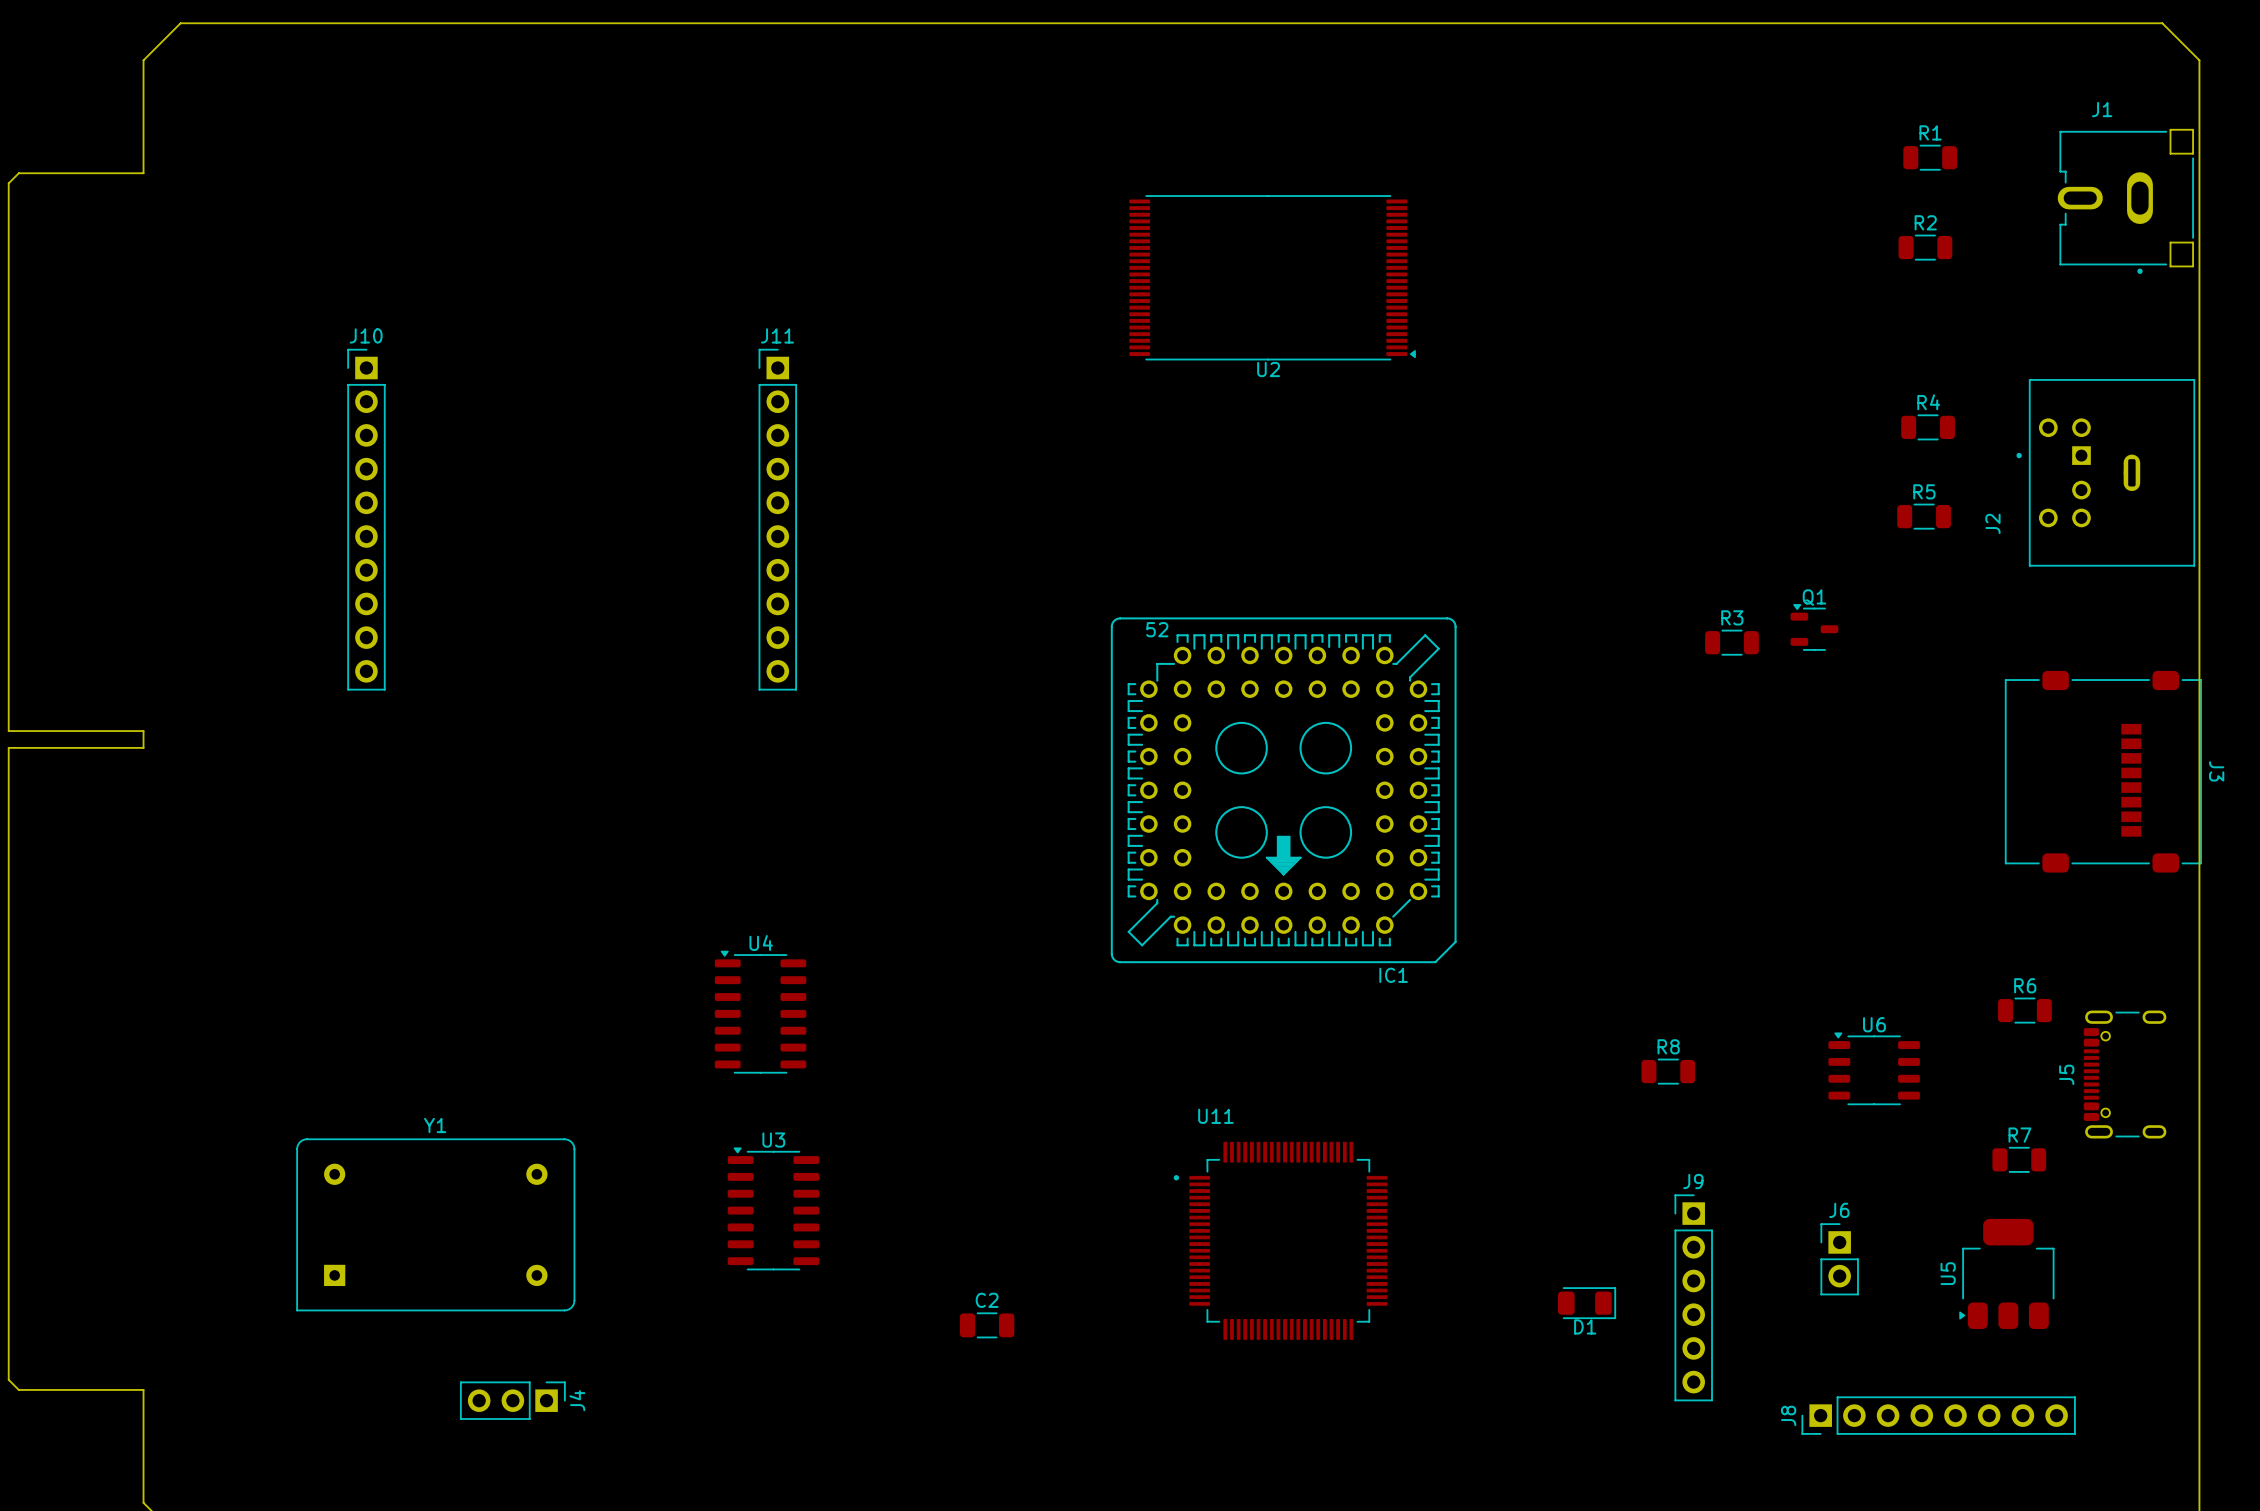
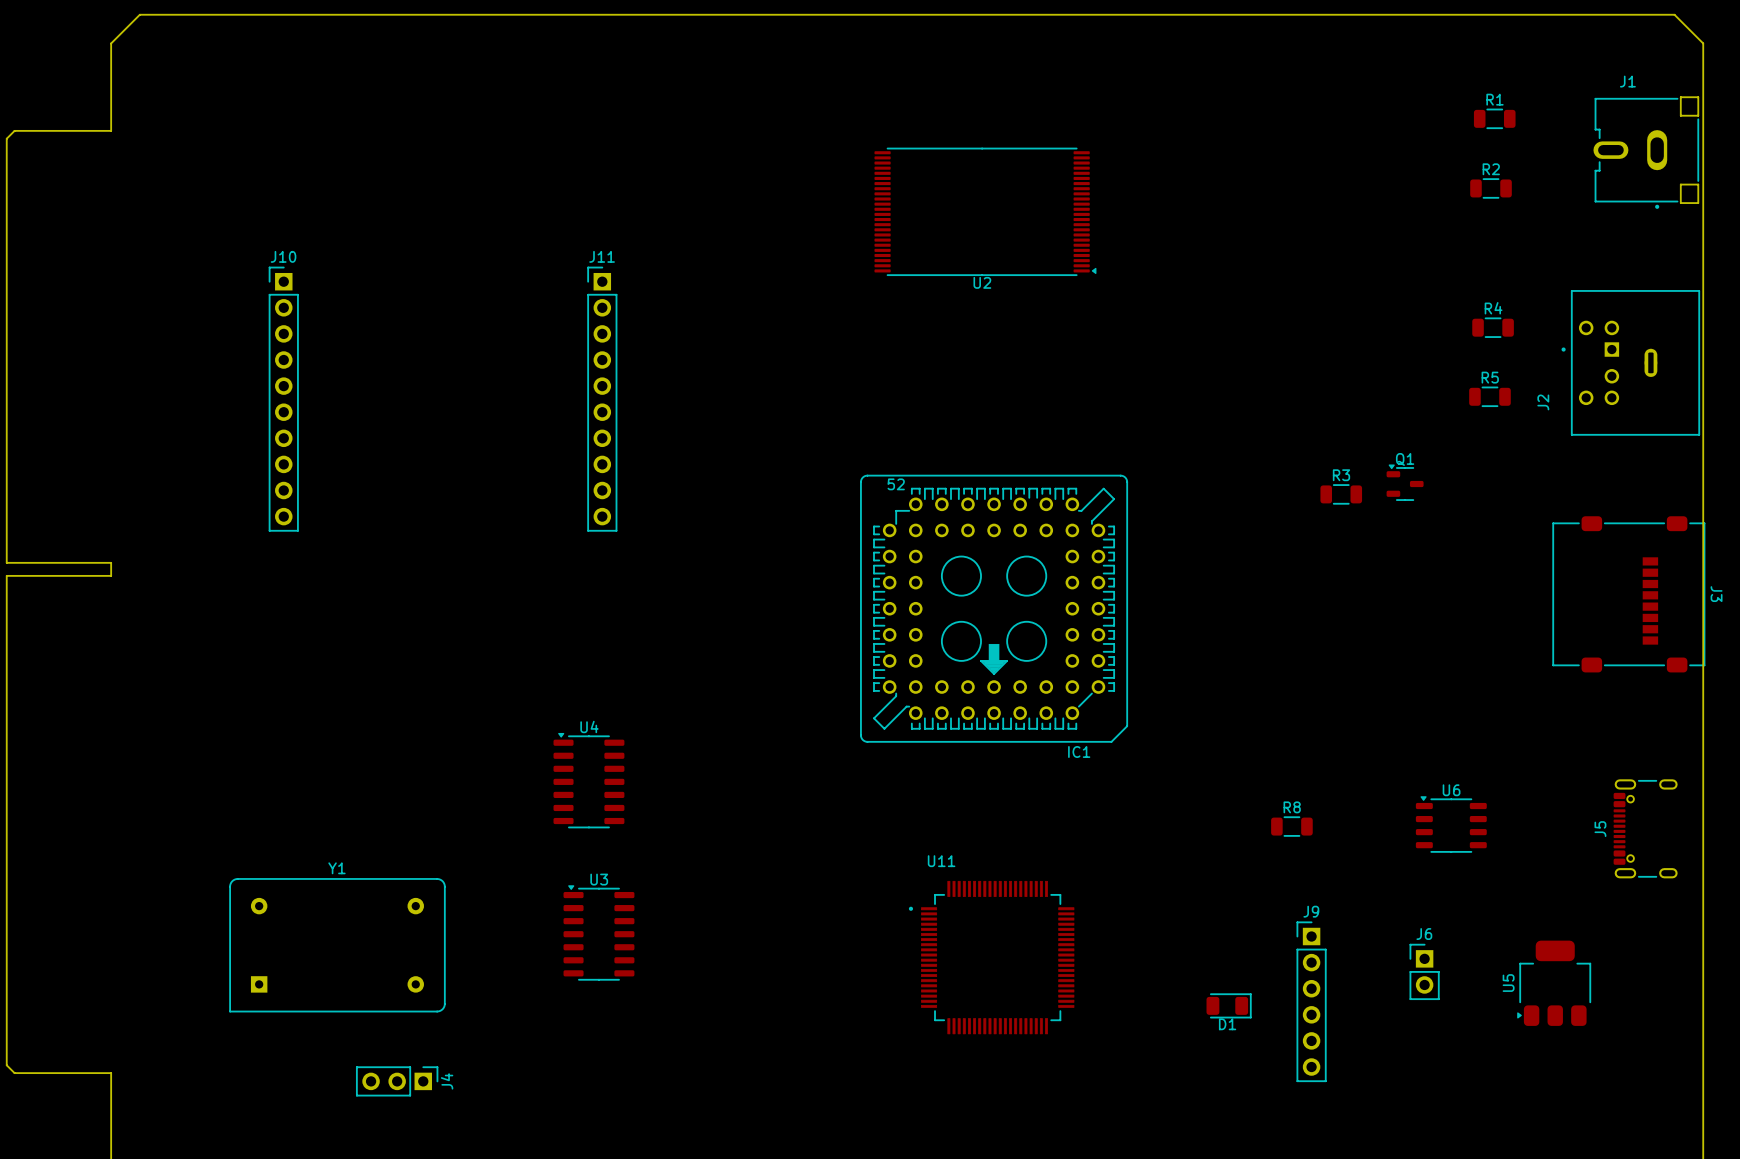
R6: (2024, 1010) -> none
R7: (2019, 1159) -> none
C2: (987, 1325) -> none
J8: (1938, 1415) -> none

